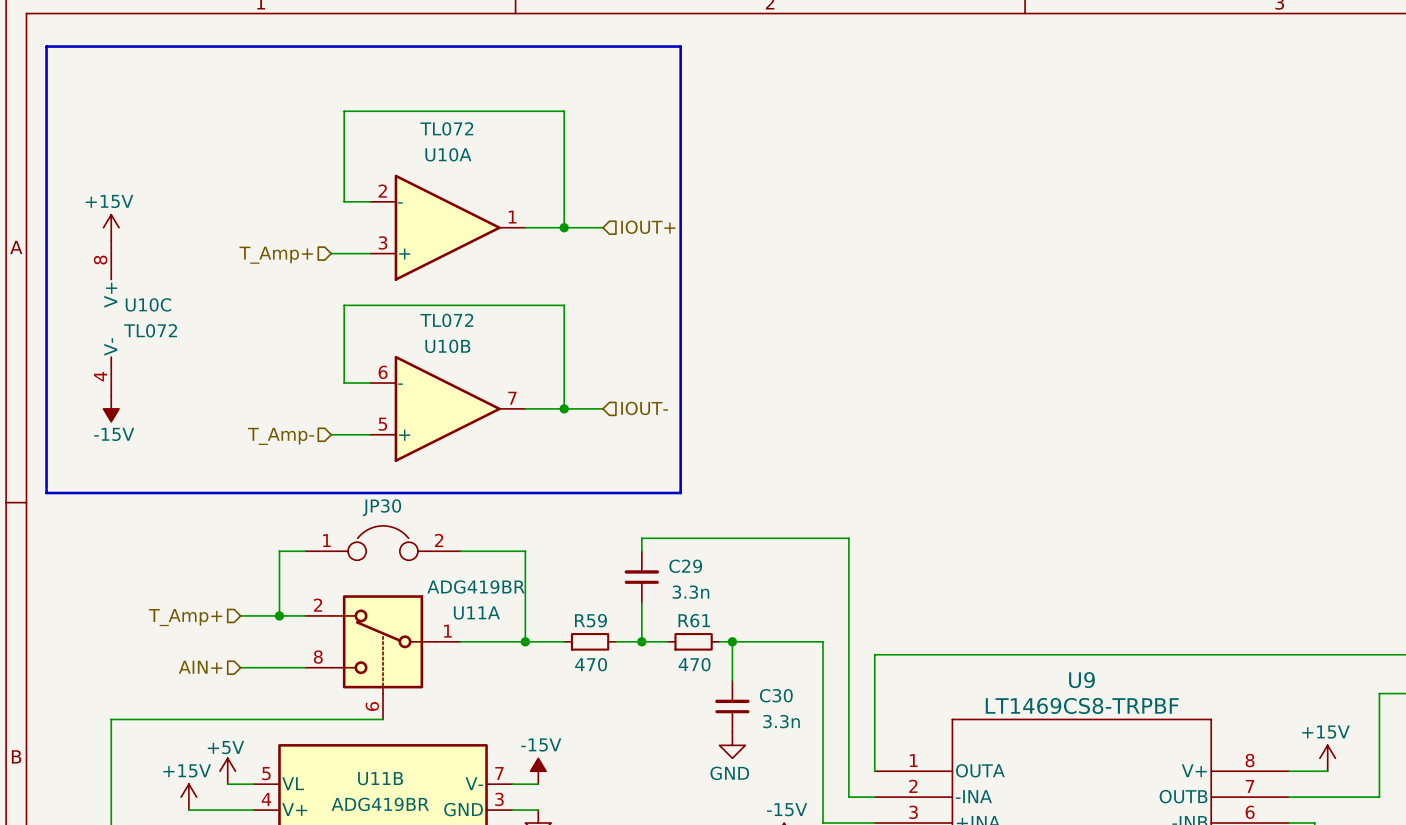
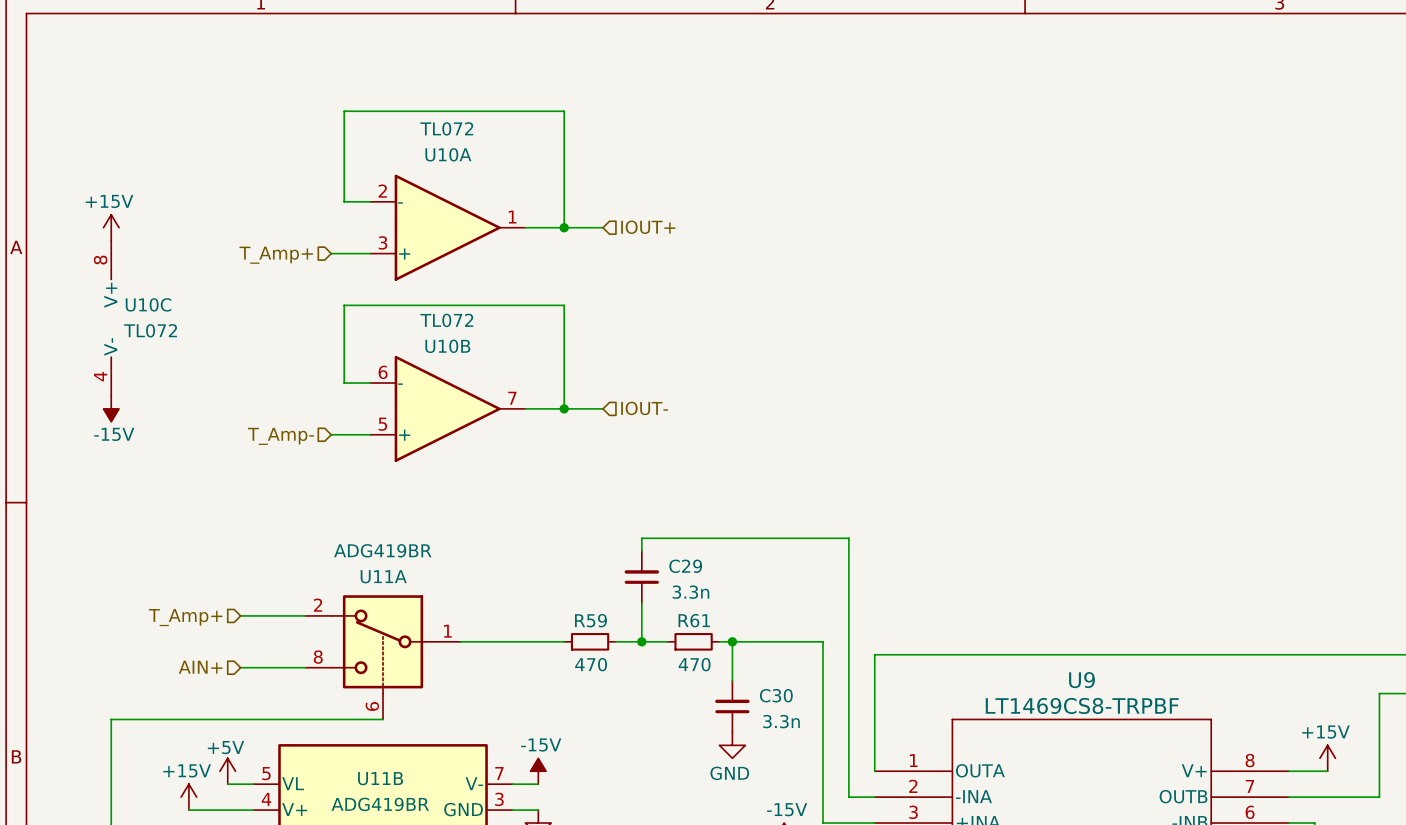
line: (46, 46) (680, 46) (680, 493) (46, 493) (46, 46) -> none
JP30: (383, 543) -> none
wire: (305, 551) (279, 551) (279, 615) -> none
wire: (460, 551) (525, 551) (525, 641) -> none
U11A value position: ADG419BR (476, 587) -> ADG419BR (382, 550)
U11A name position: U11A (476, 613) -> U11A (383, 576)
junction: (279, 615) -> none
junction: (525, 641) -> none

